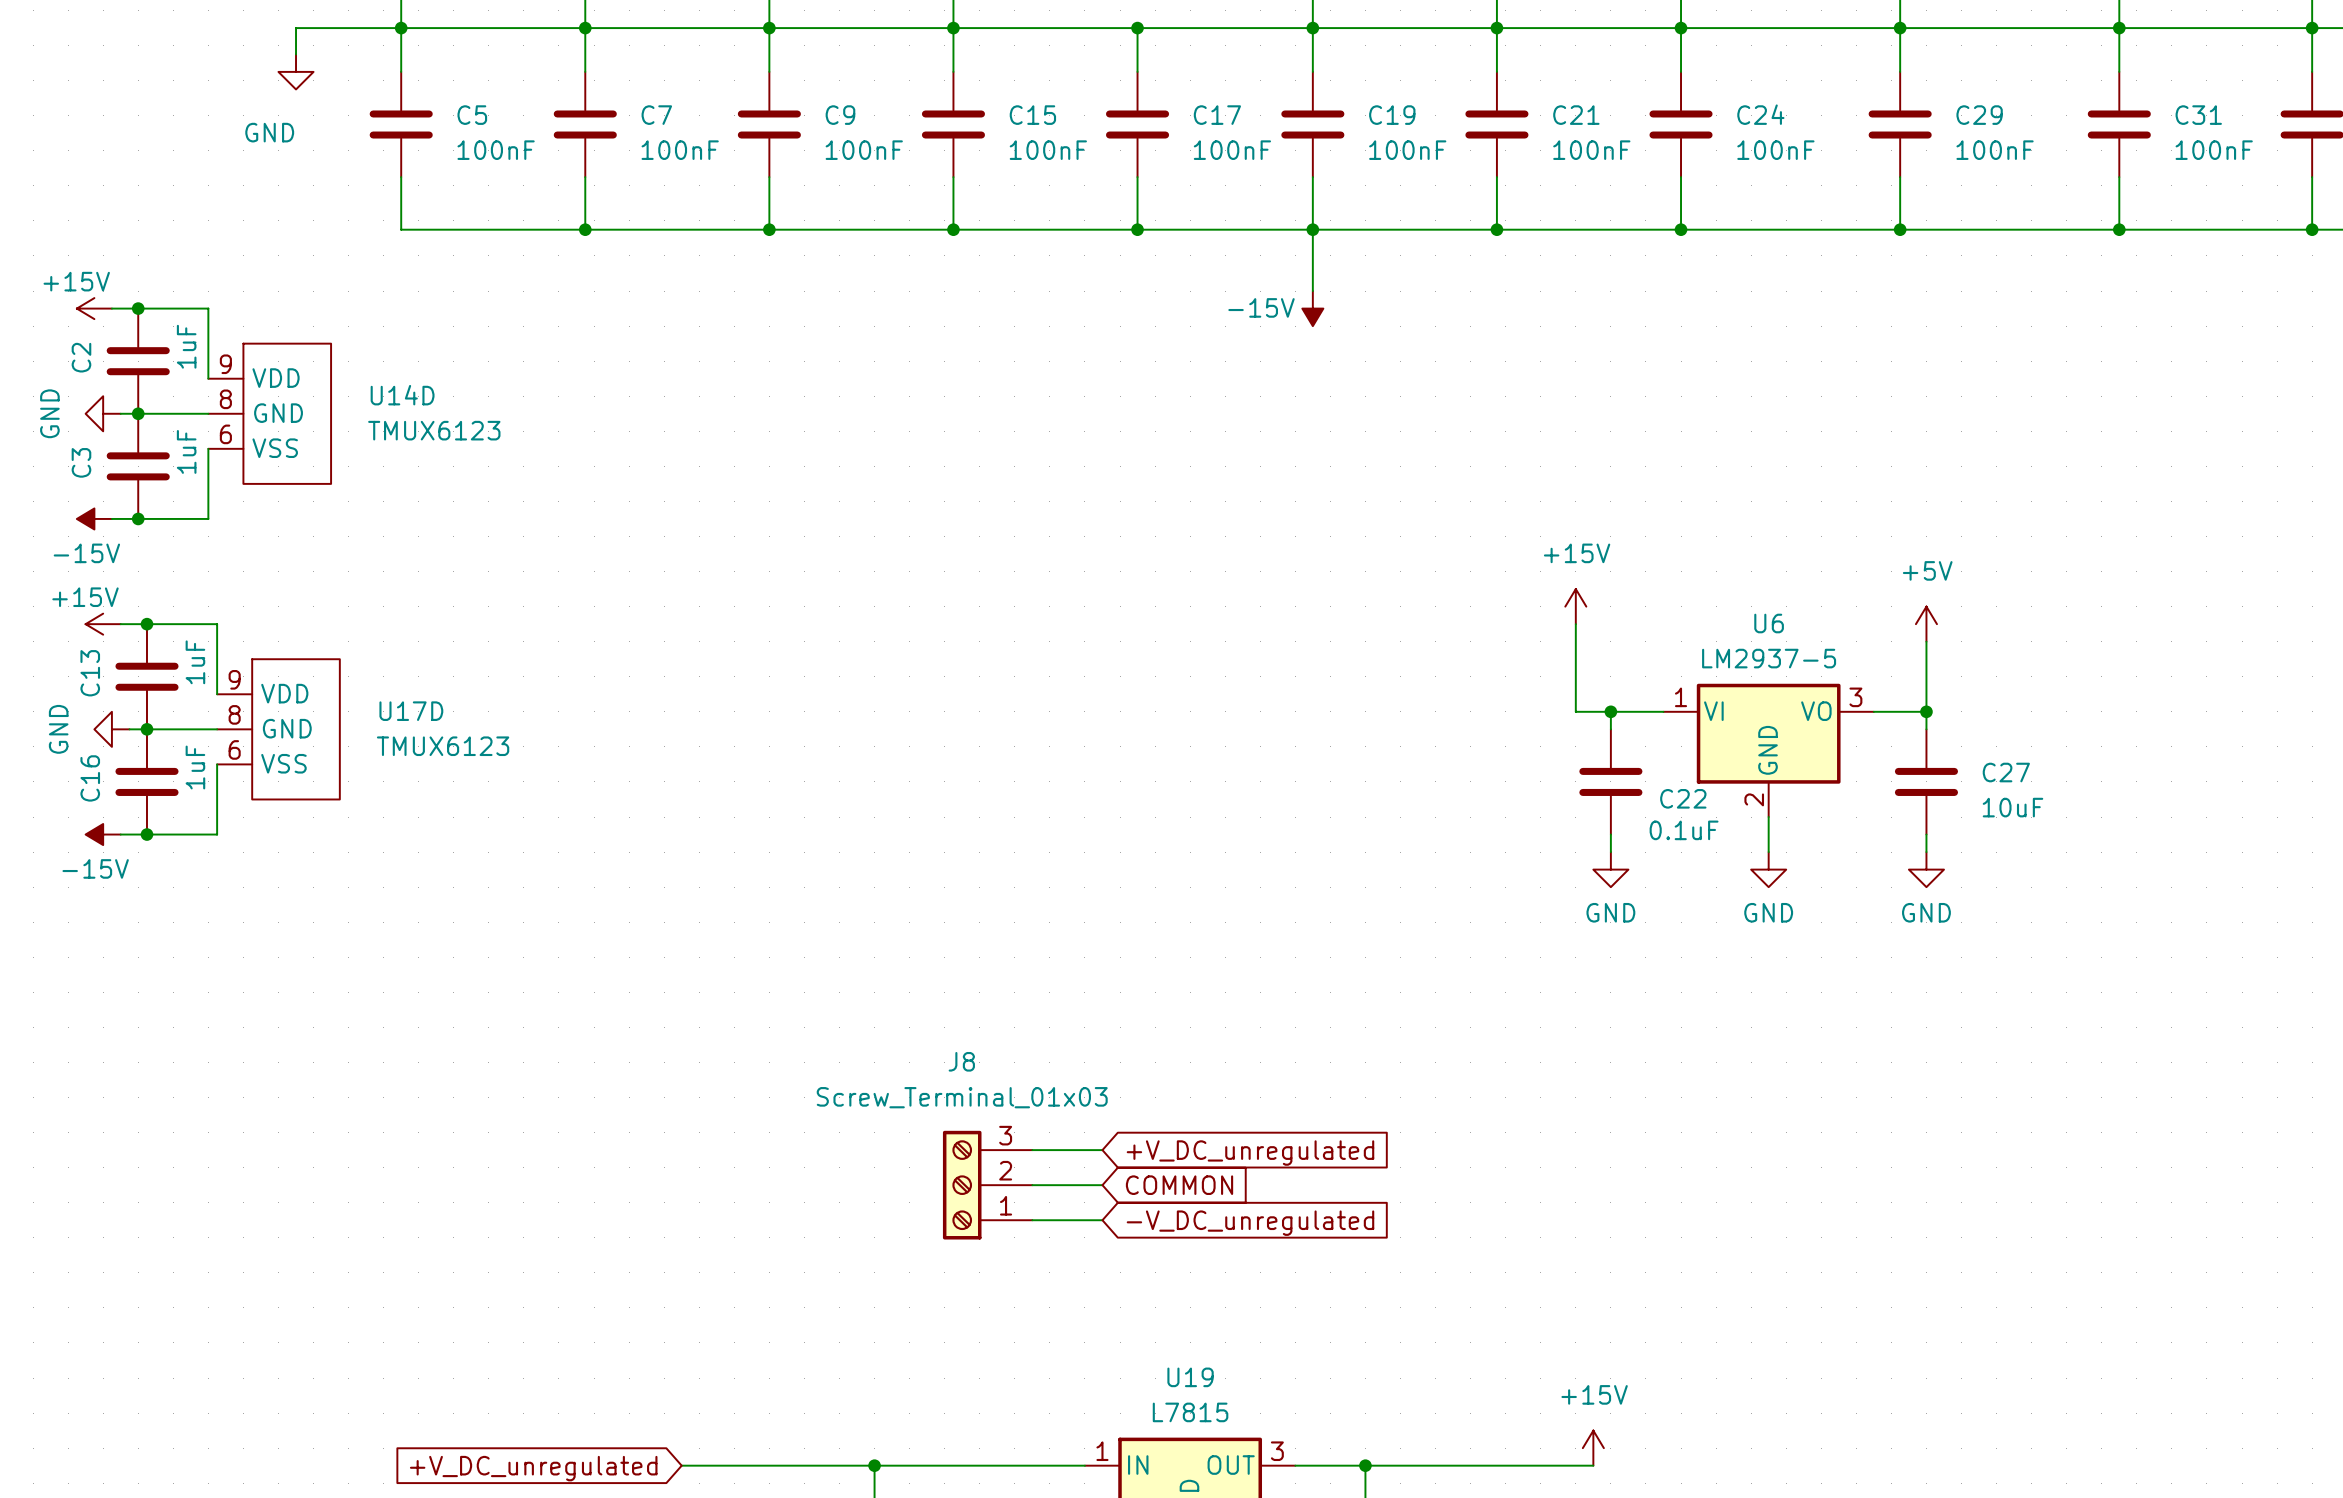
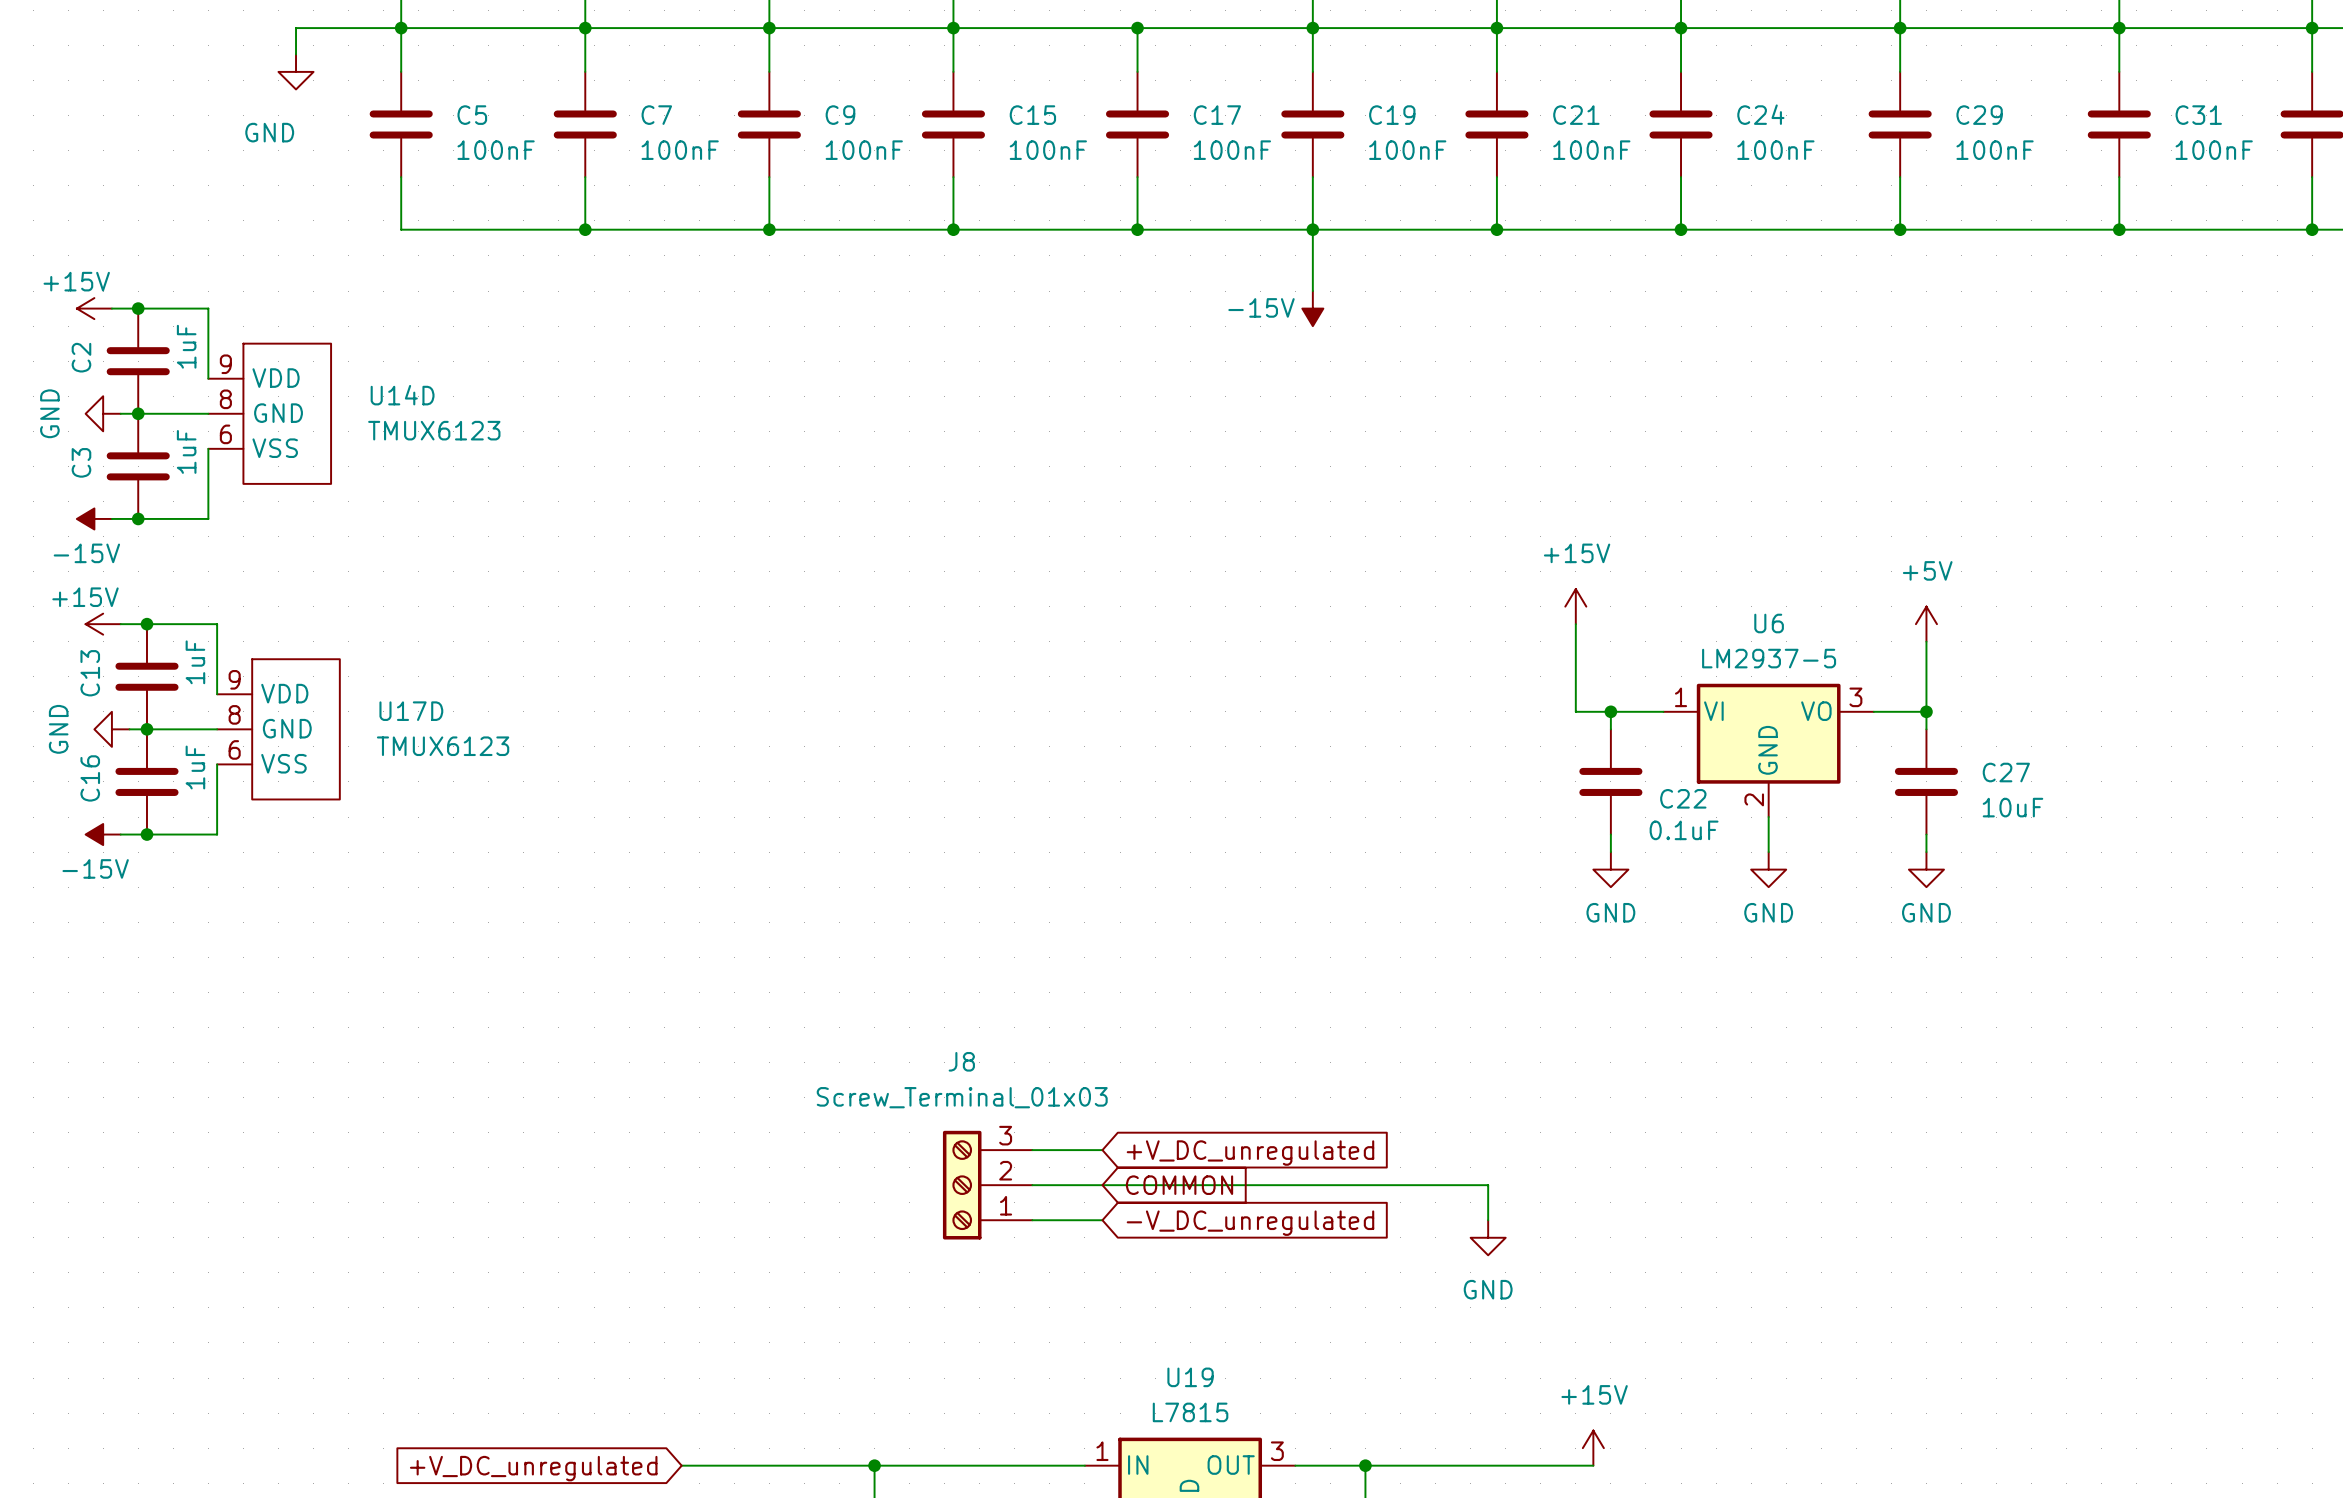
wire: none -> (1102, 1185) (1488, 1185) (1488, 1220)
power symbol: none -> GND (1488, 1237)

